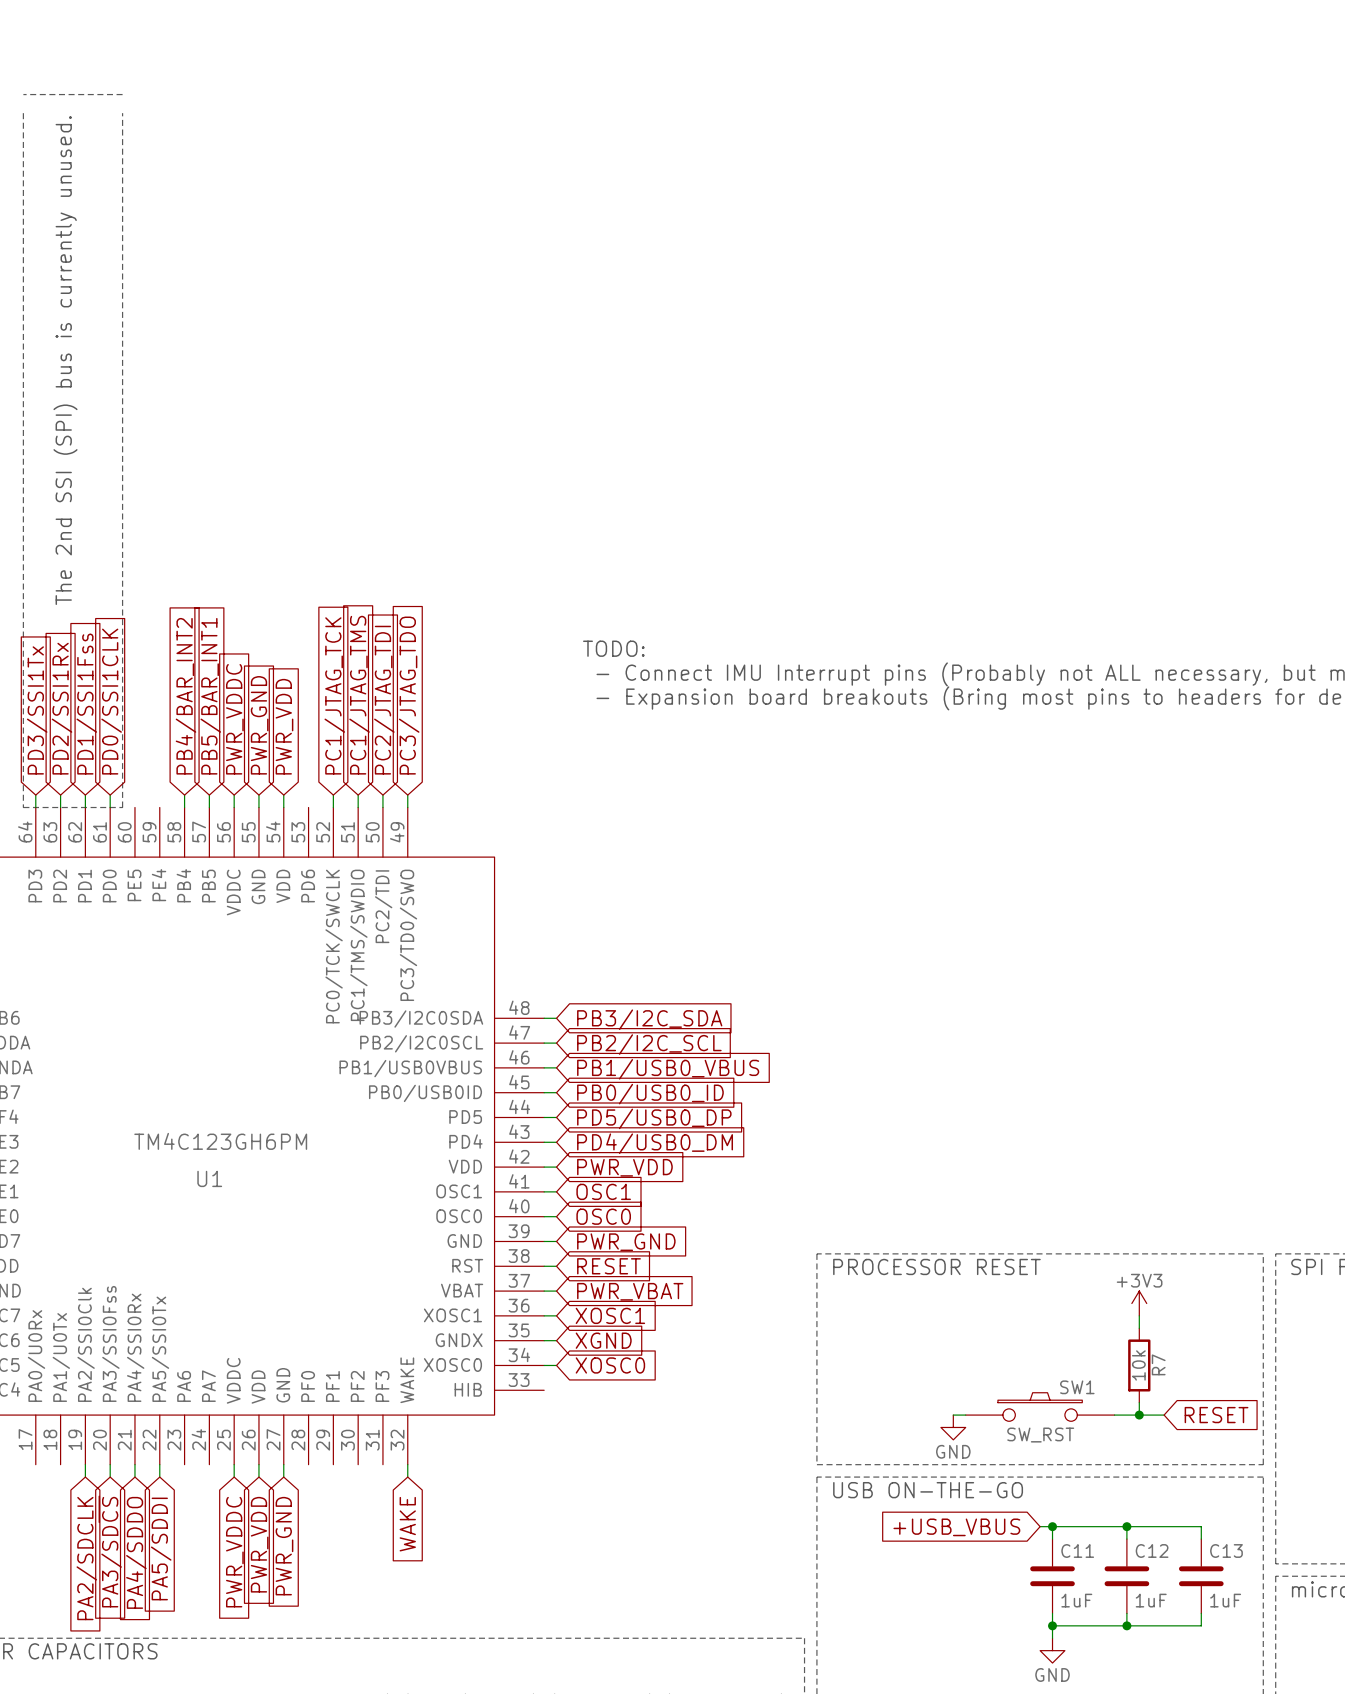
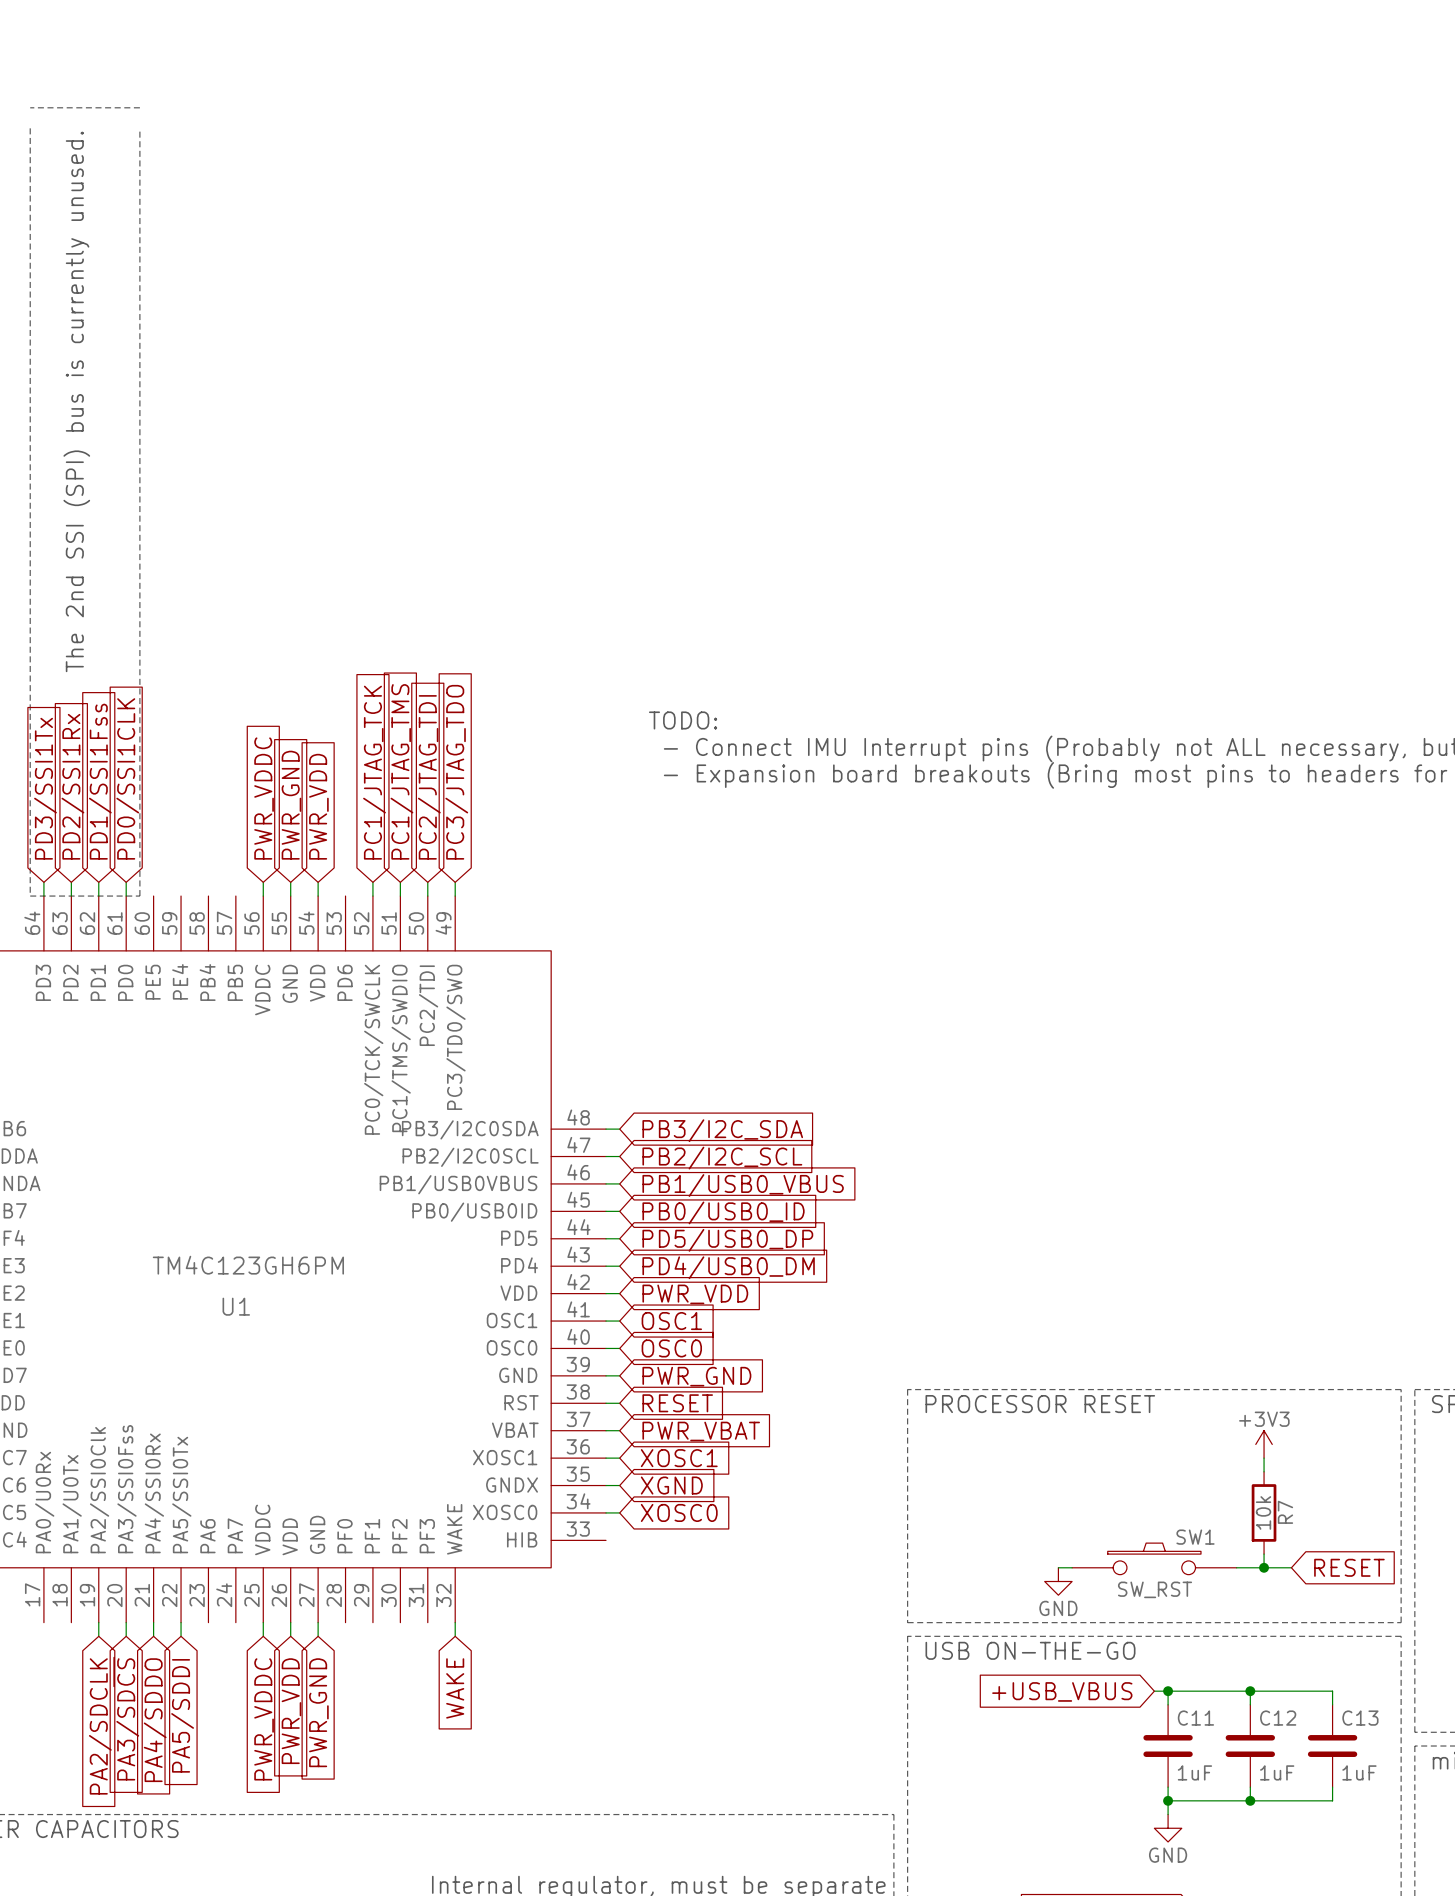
global label: PB4/BAR_INT2 (185, 696) -> none
global label: PB5/BAR_INT1 (210, 696) -> none
wire: (184, 795) (184, 807) -> none
wire: (209, 795) (209, 807) -> none

